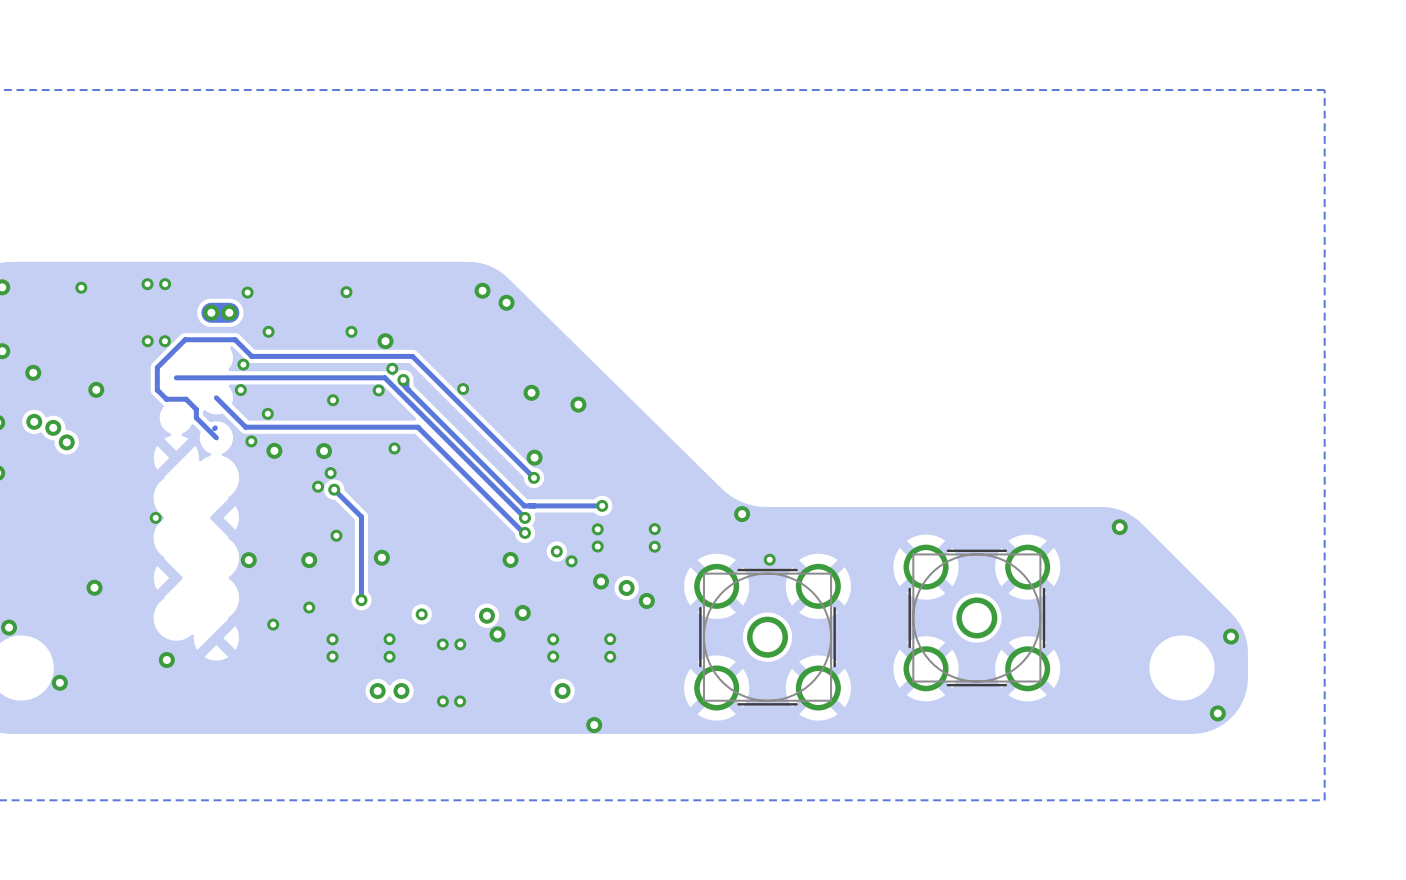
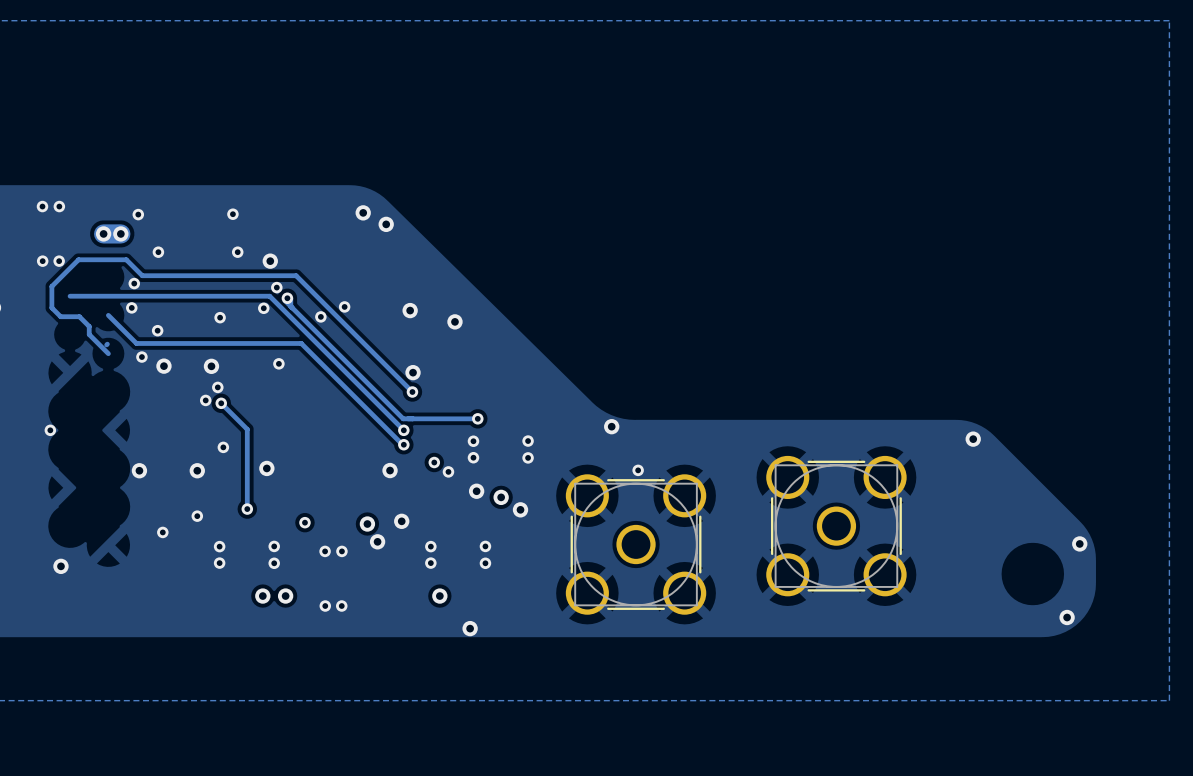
via: none -> (320, 316)

